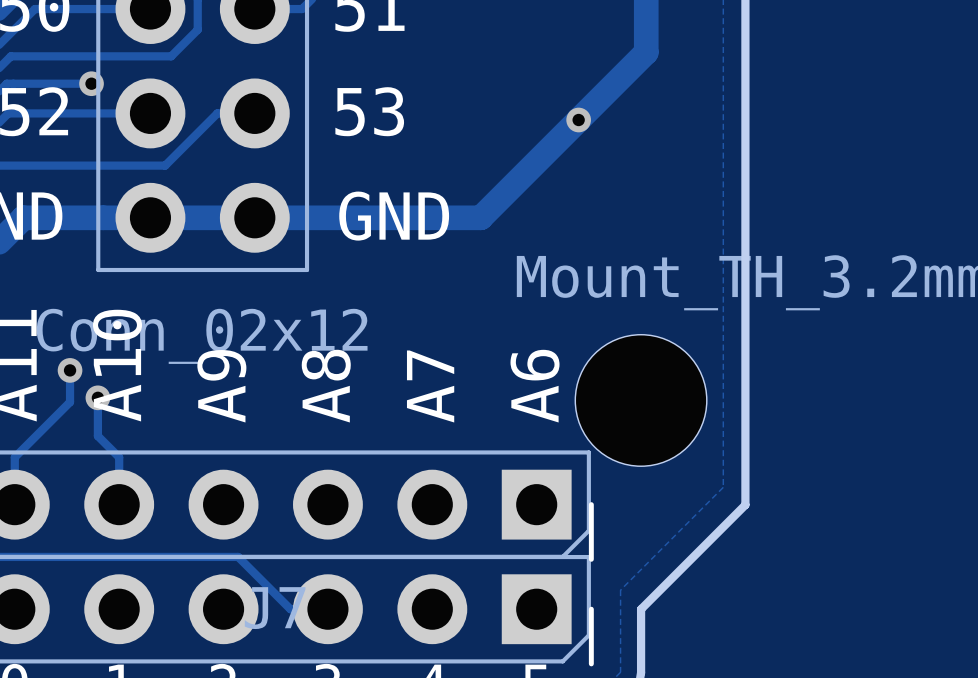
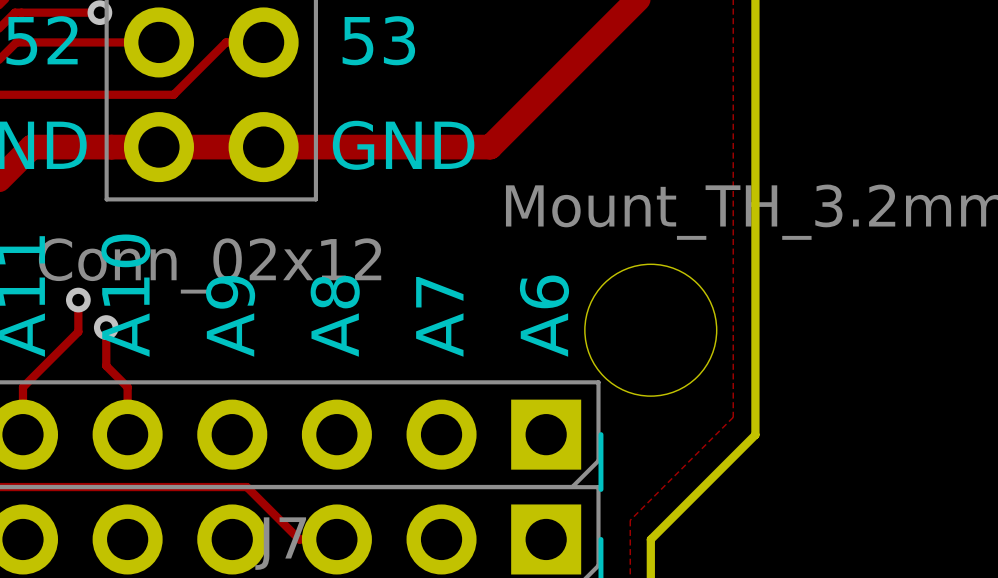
via: (578, 120) -> none

